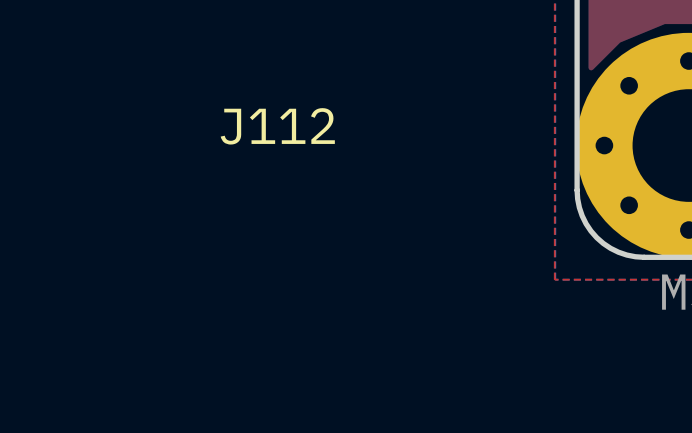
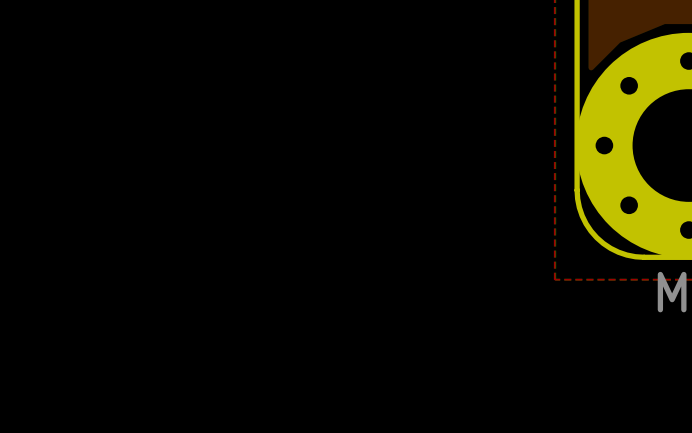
J112 name: J112 (277, 126) -> none

